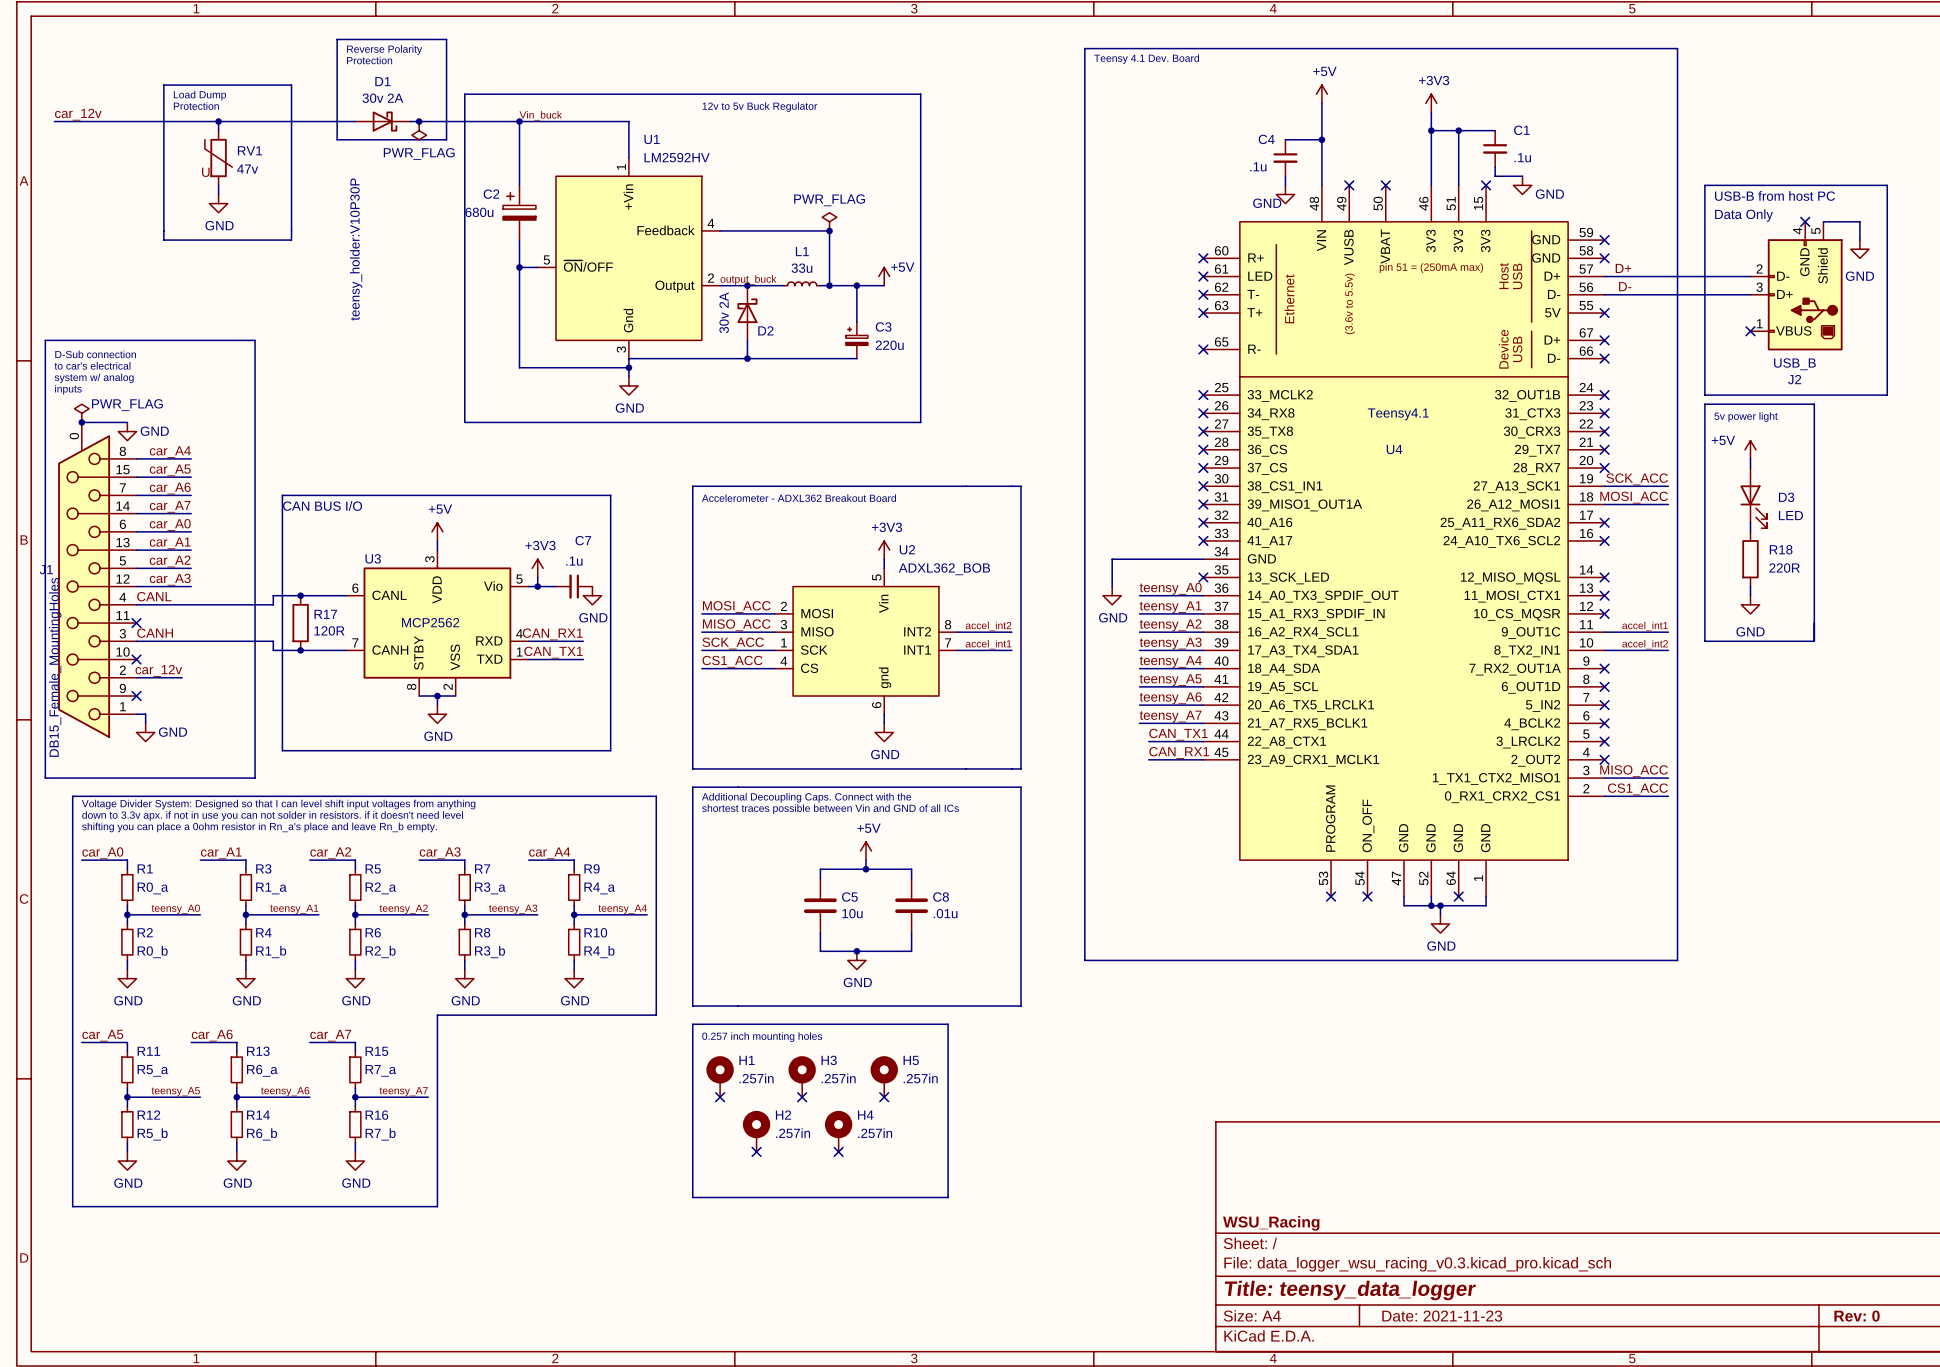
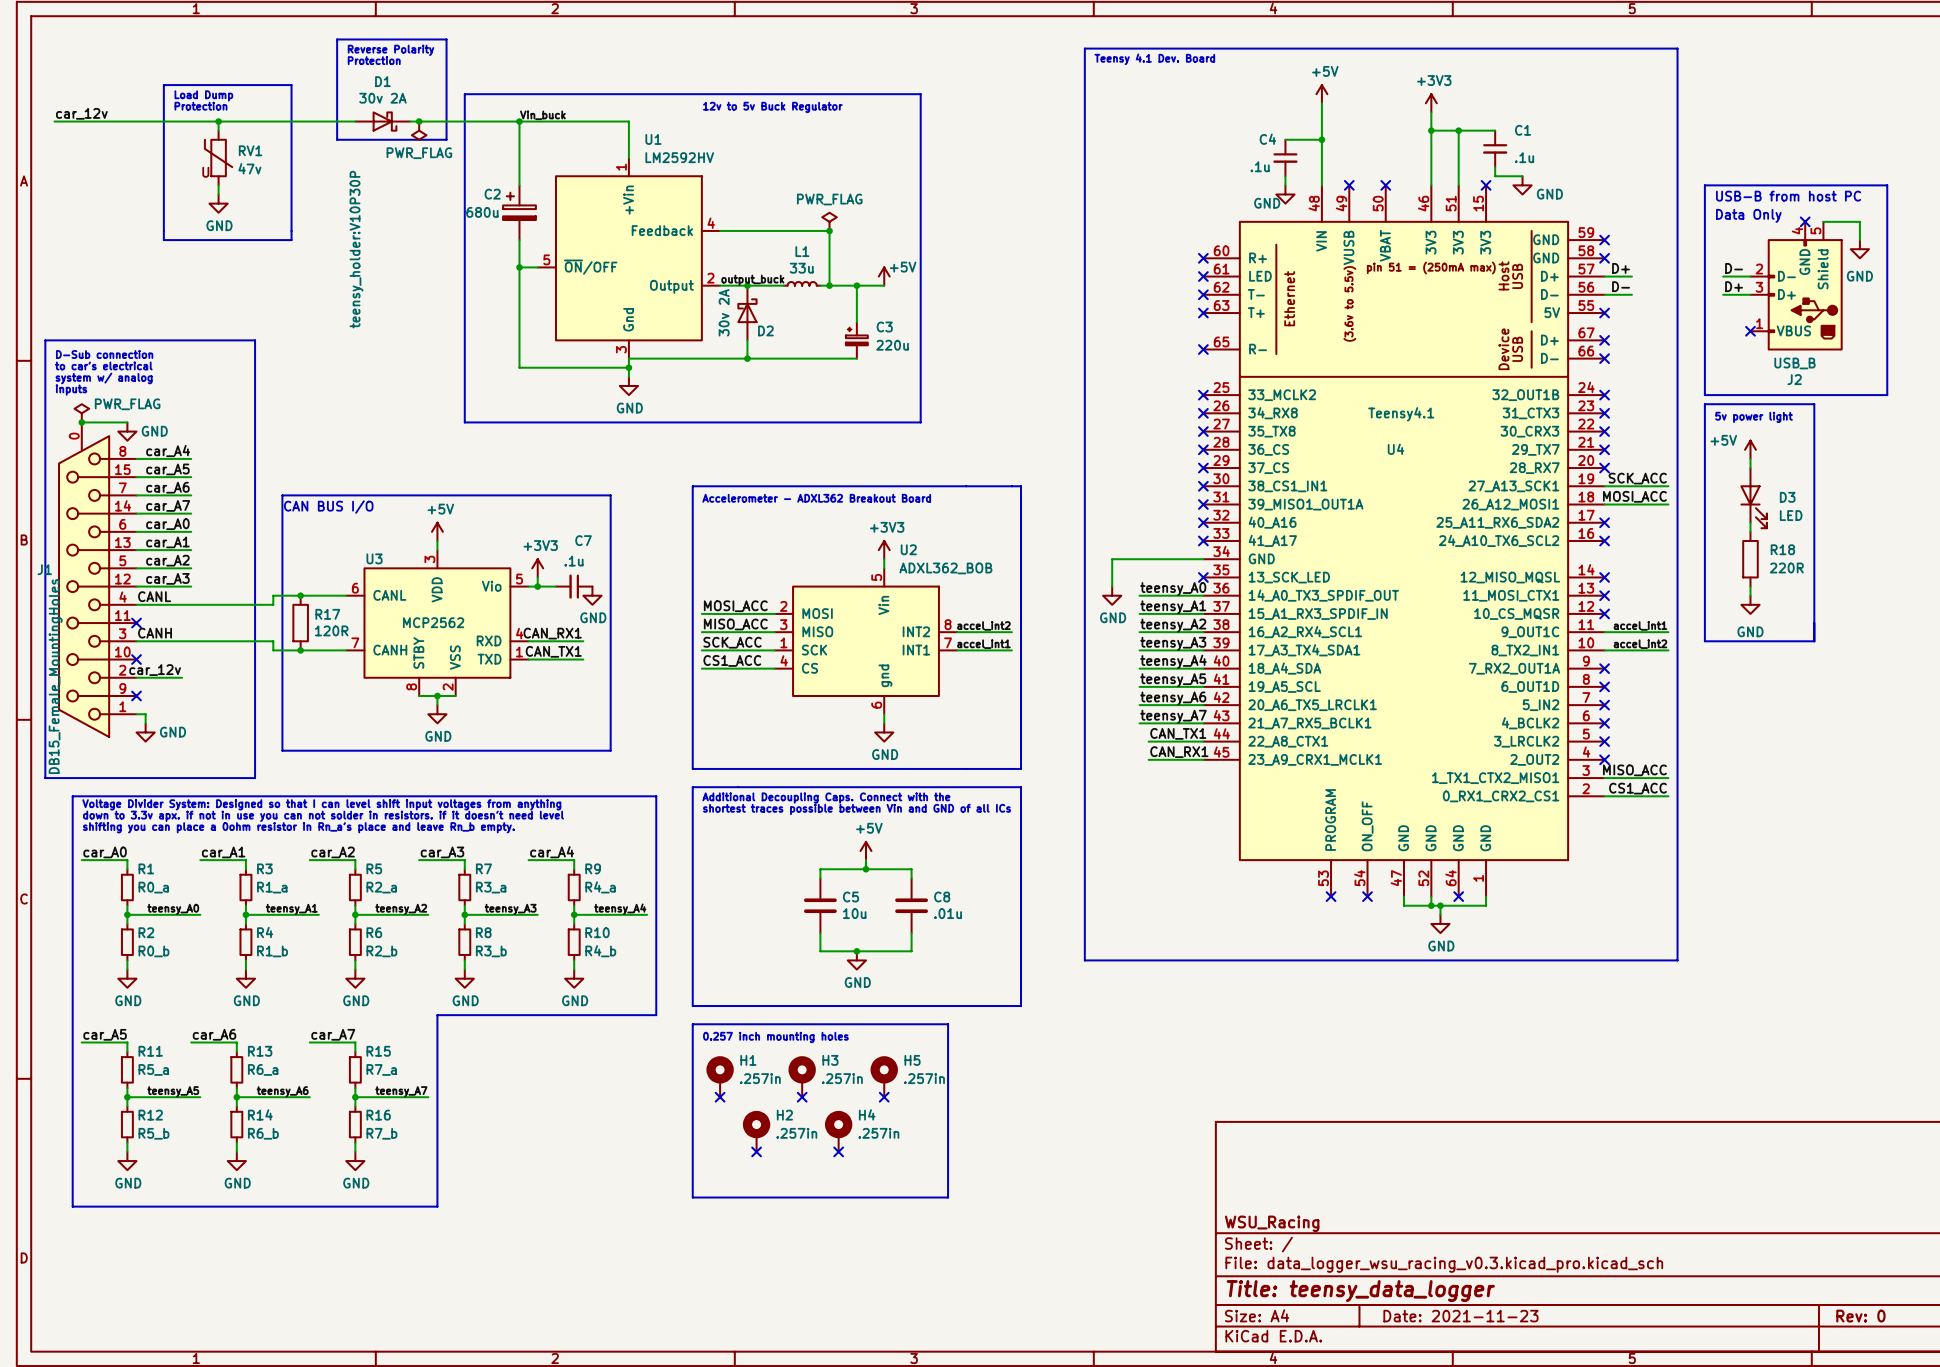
label: none -> D- (1734, 268)
wire: (1631, 276) (1723, 276) -> none
label: none -> D+ (1734, 286)
wire: (1631, 294) (1723, 294) -> none

